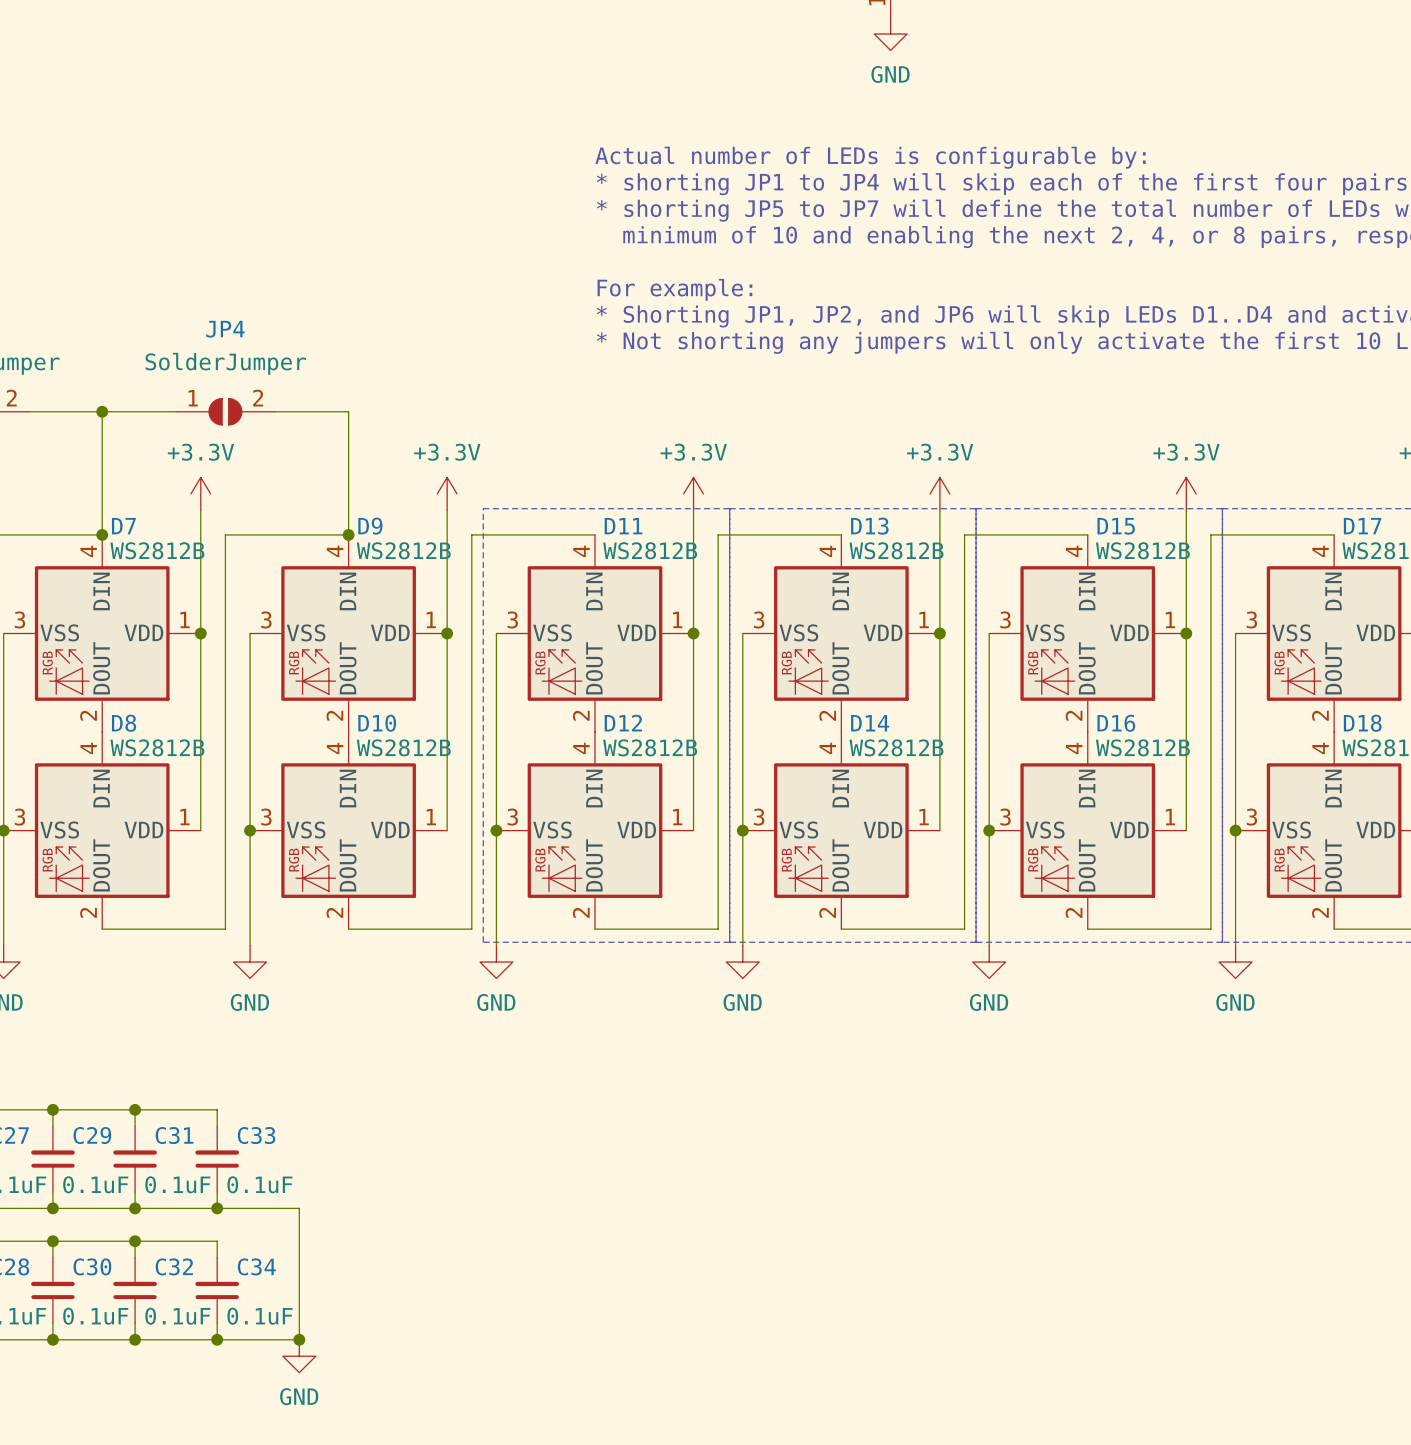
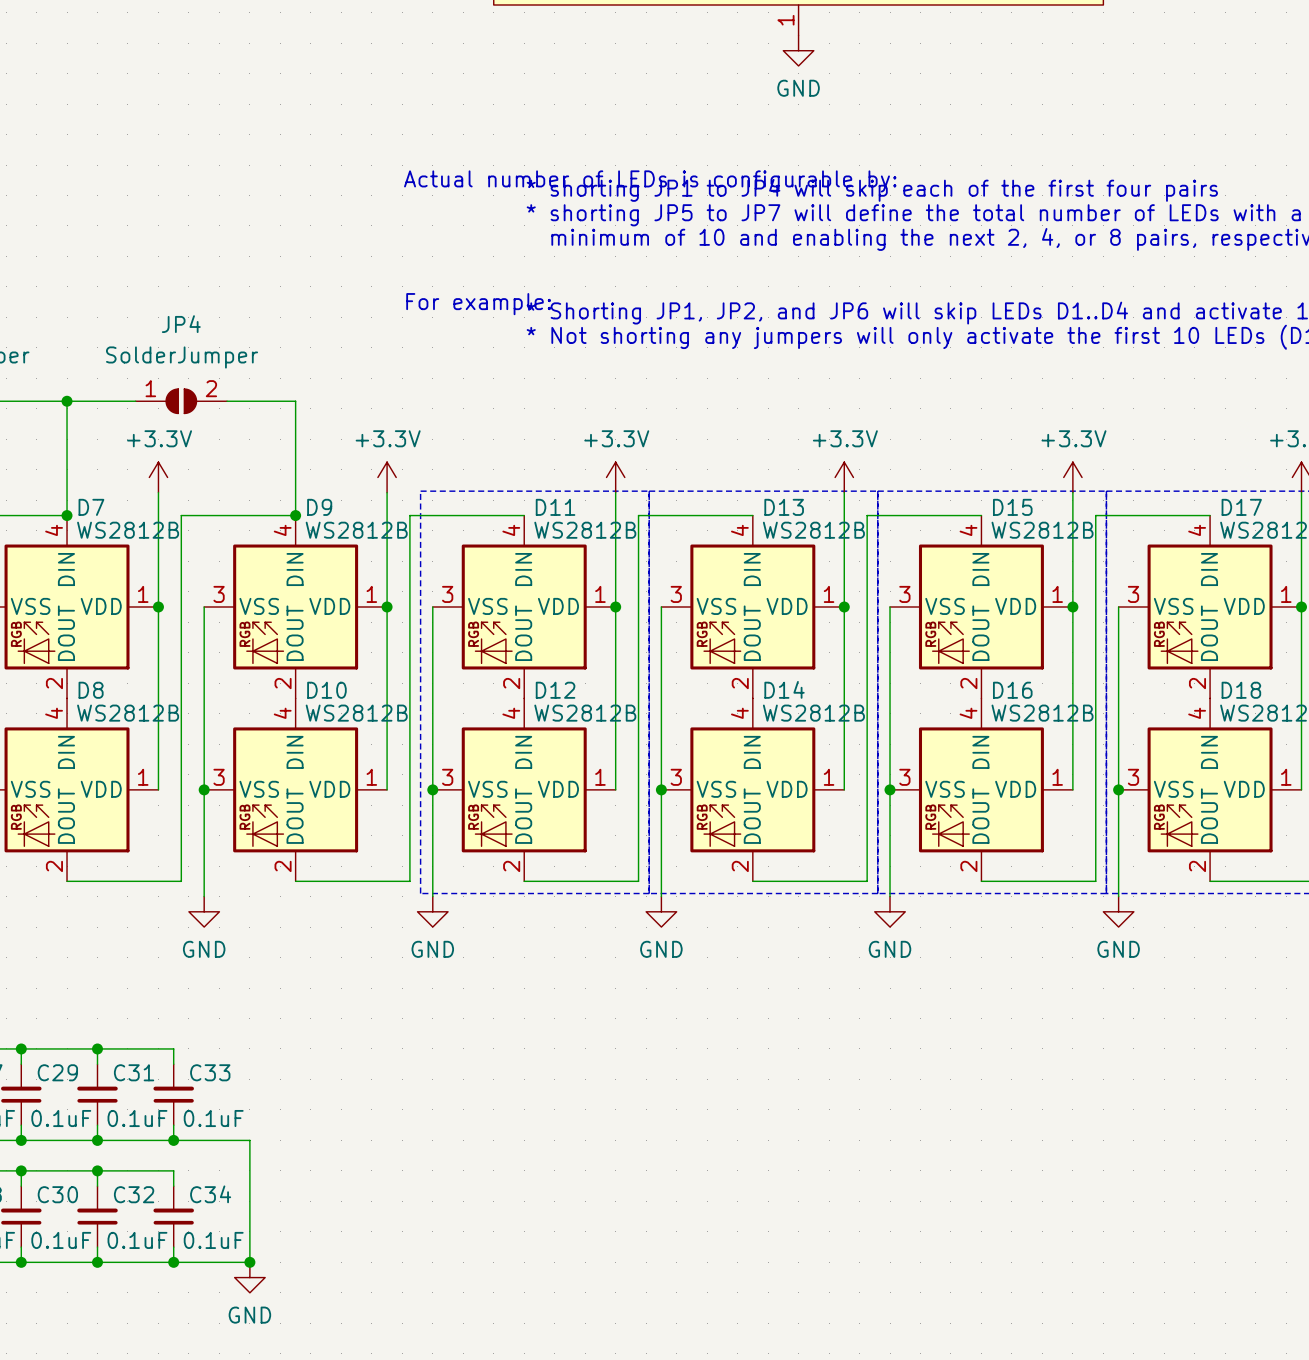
text position: Actual number of LEDs is configurable by: (870, 157) -> Actual number of LEDs is configurable by: (650, 181)
text position: For example: (674, 289) -> For example: (478, 304)

